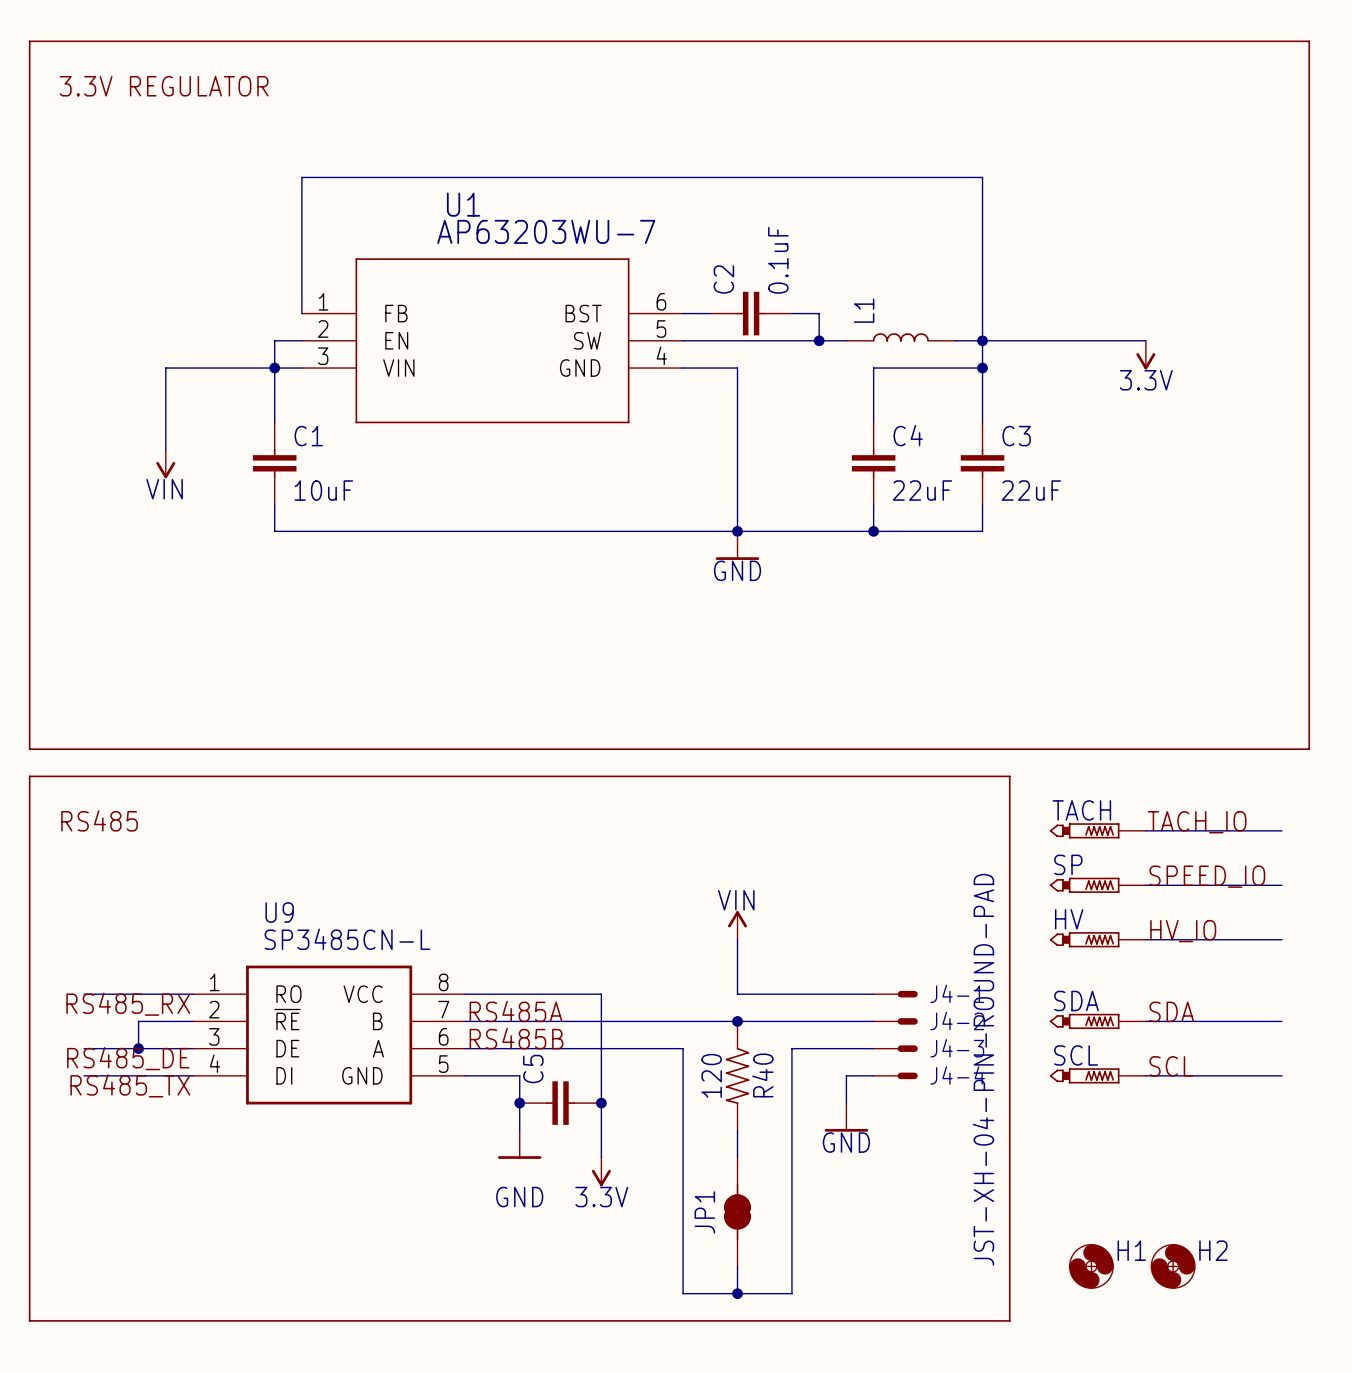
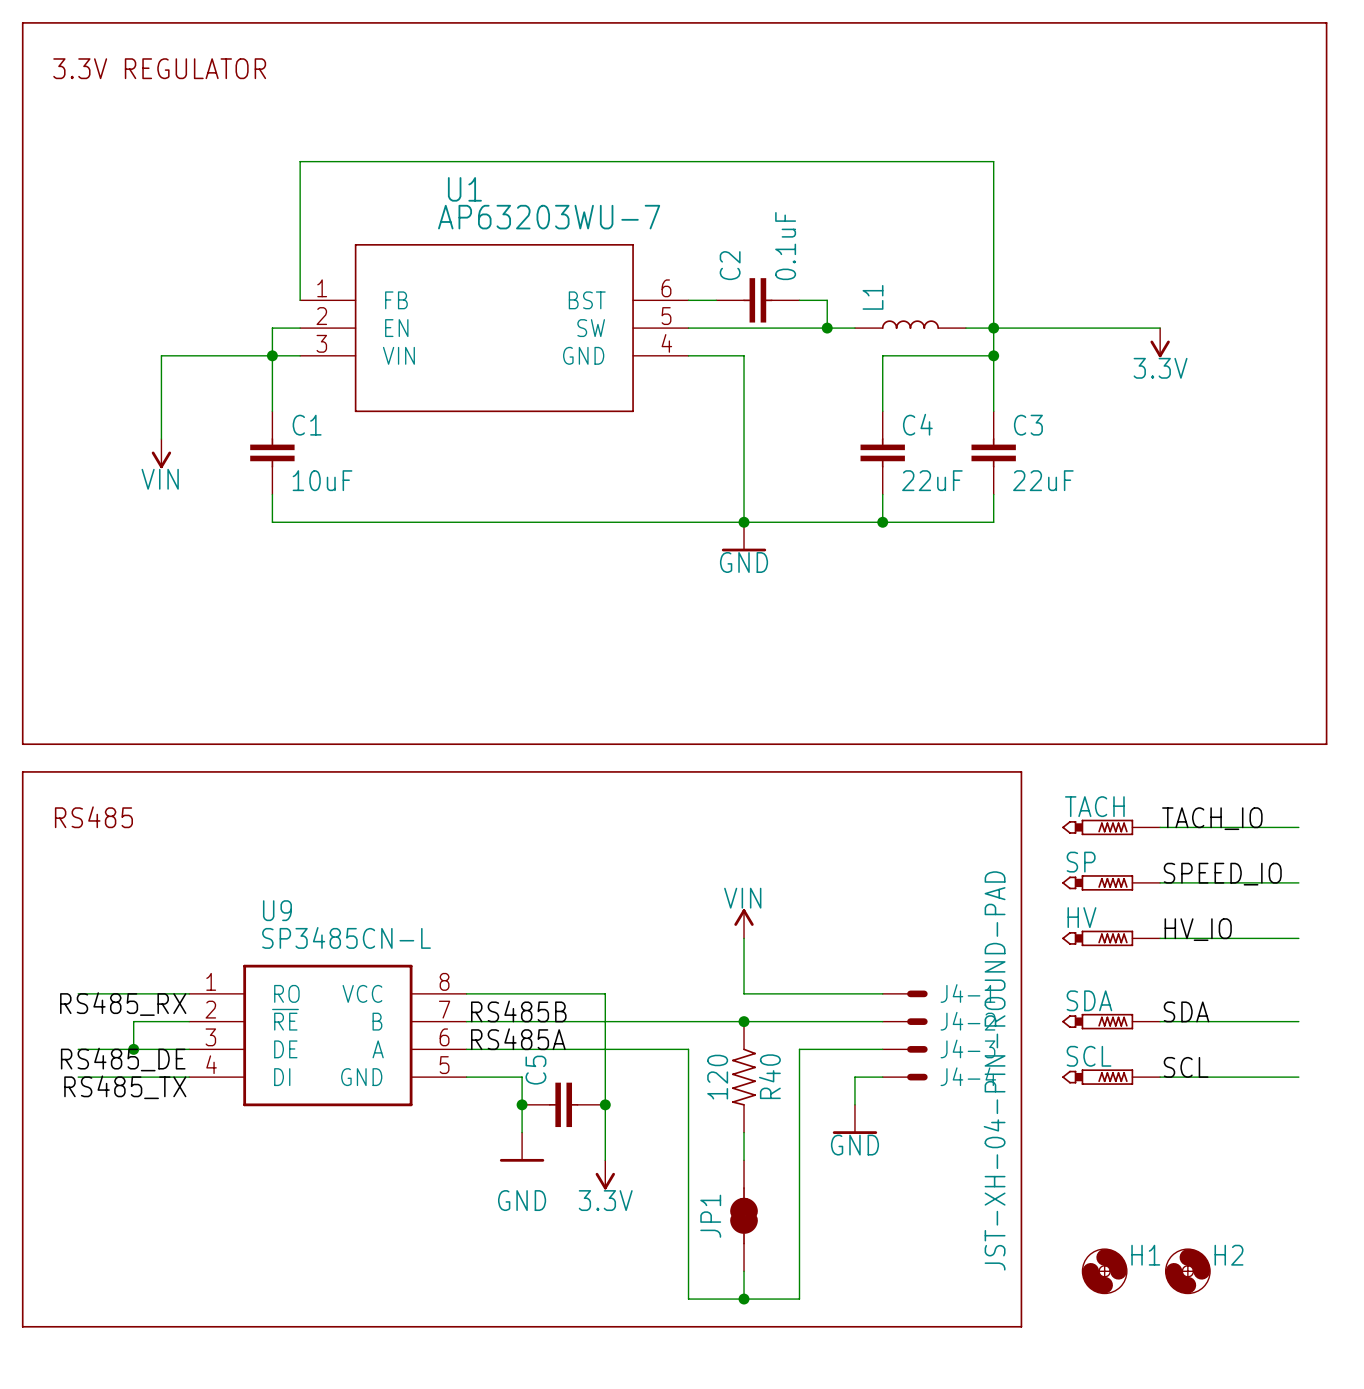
label: RS485A (516, 1011) -> RS485B (518, 1011)
label: RS485B (516, 1038) -> RS485A (518, 1039)

